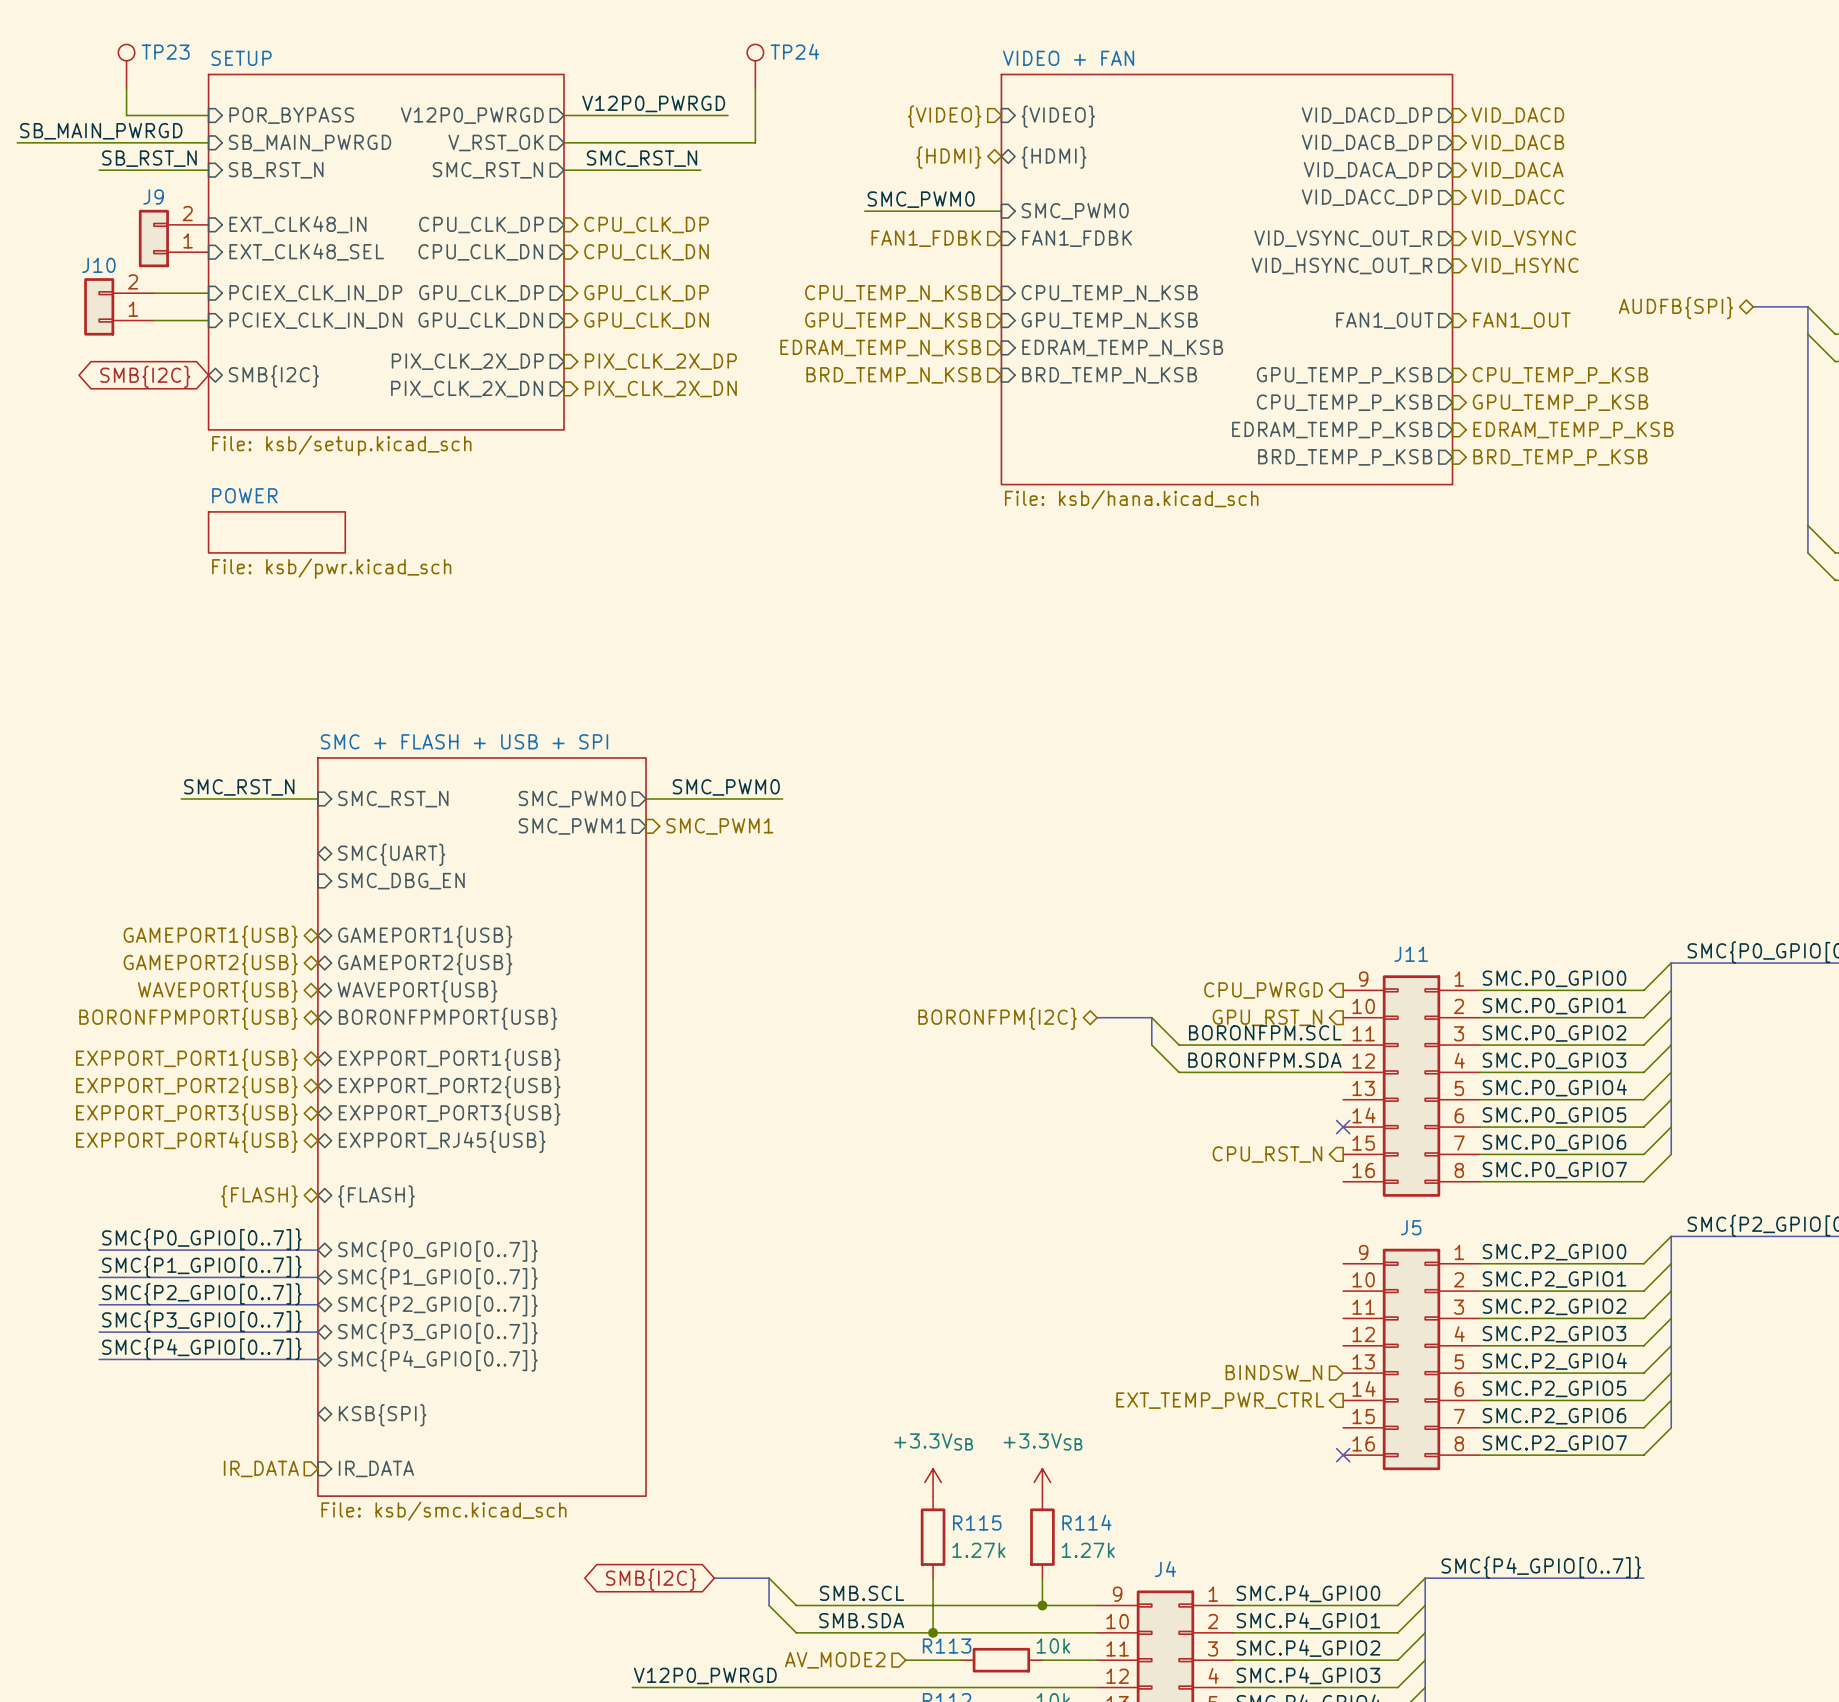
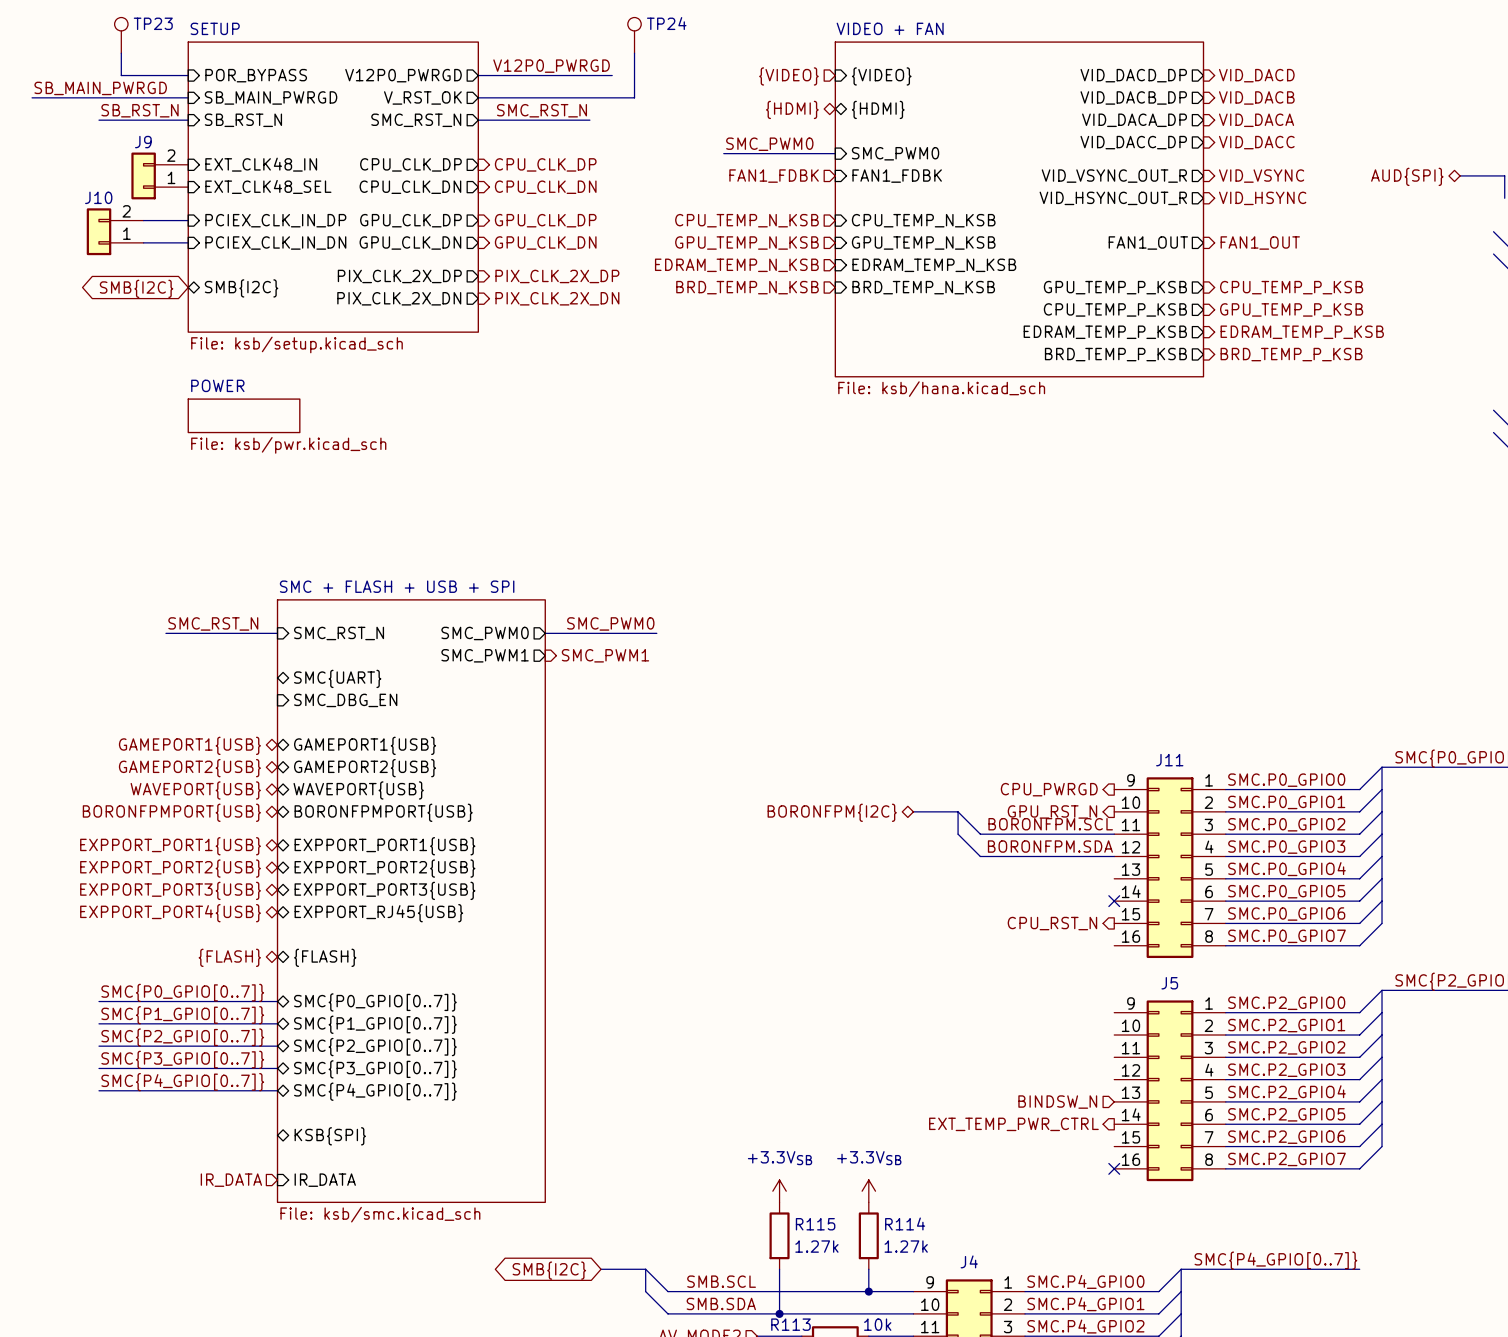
bus: none -> (1460, 175) (1504, 175) (1504, 198)
hierarchical label: none -> AUD{SPI} (1407, 176)
bus: (1753, 306) (1807, 306) (1807, 552) -> none
hierarchical label: AUDFB{SPI} (1675, 307) -> none

